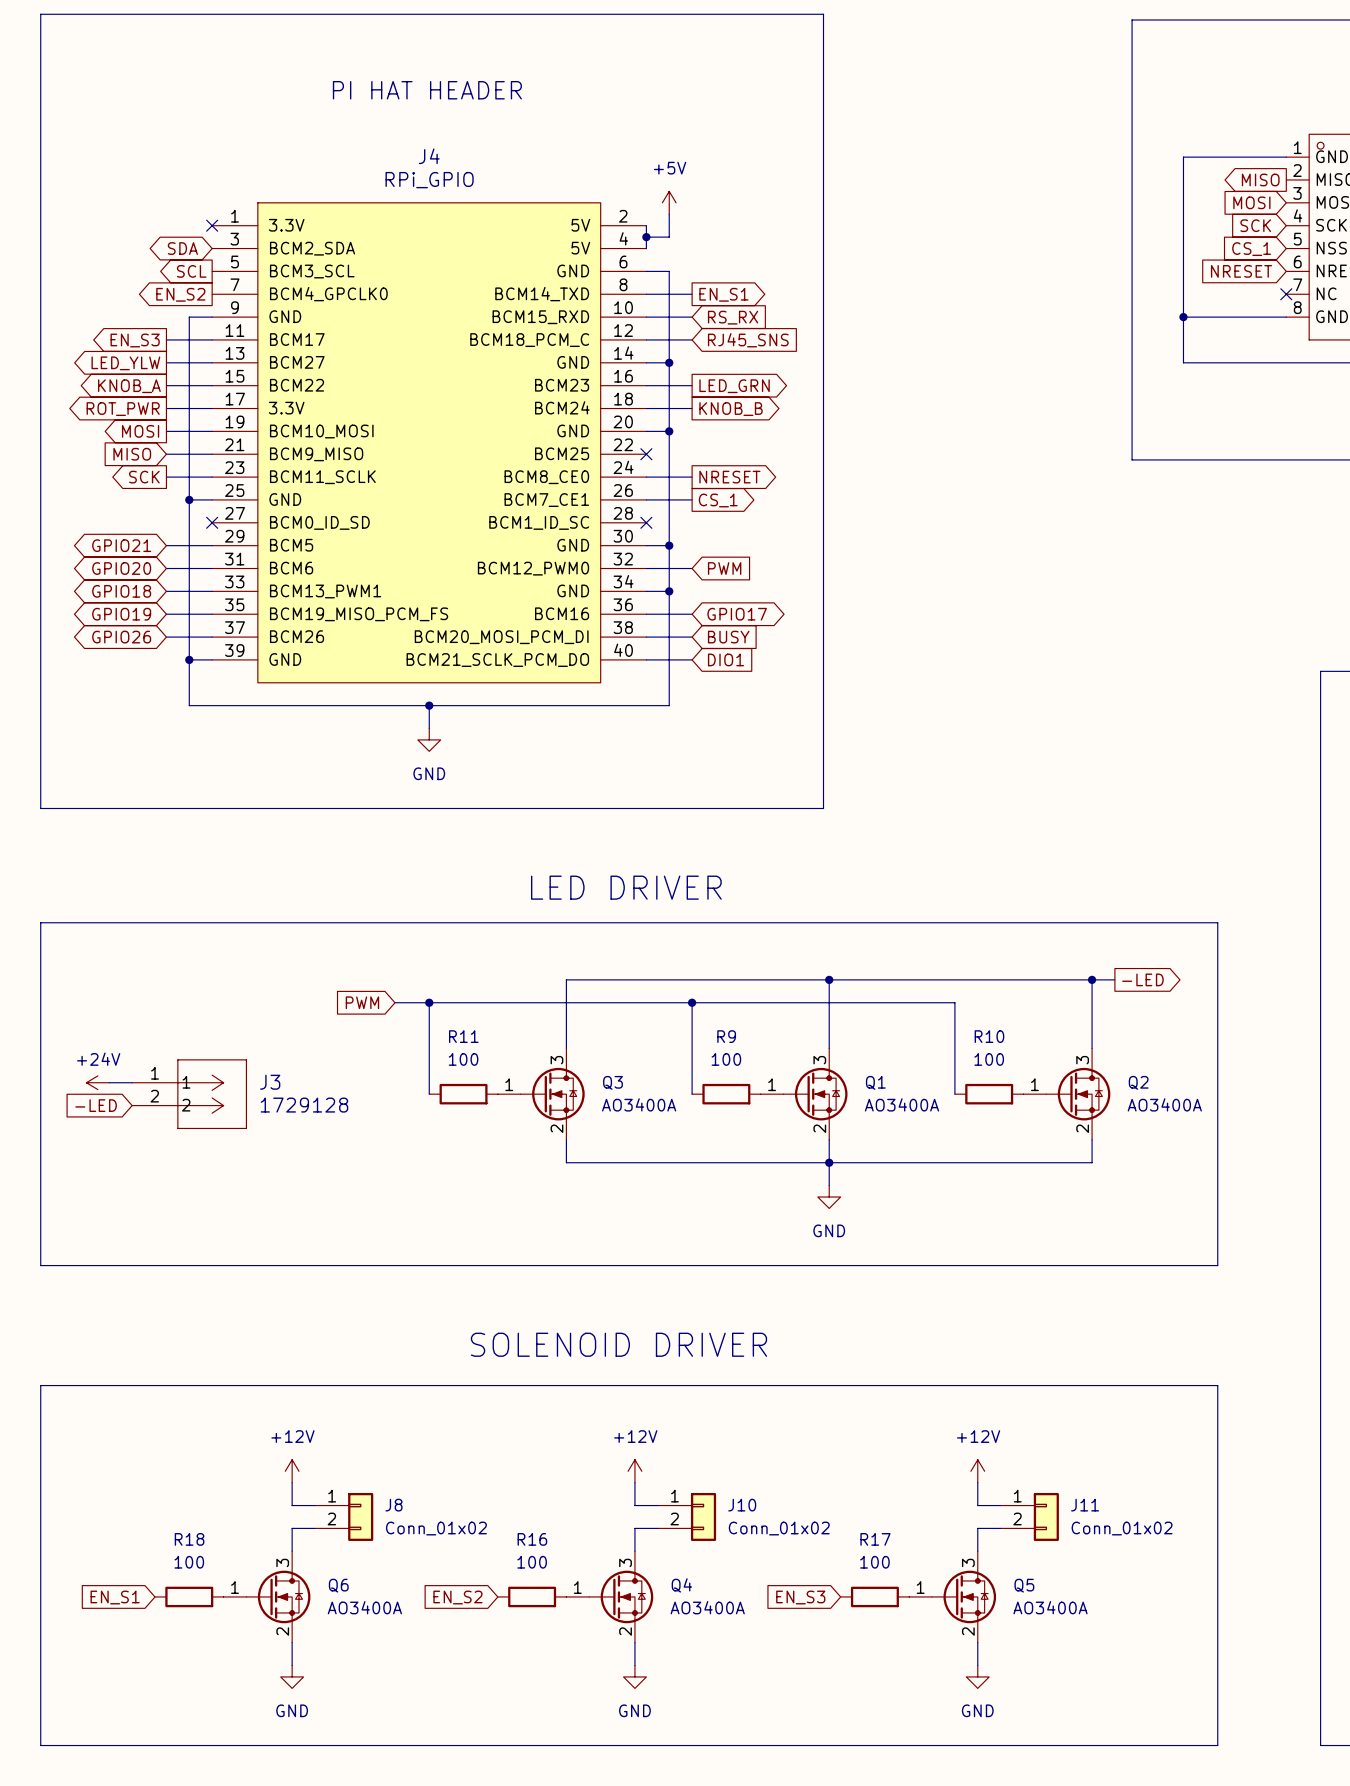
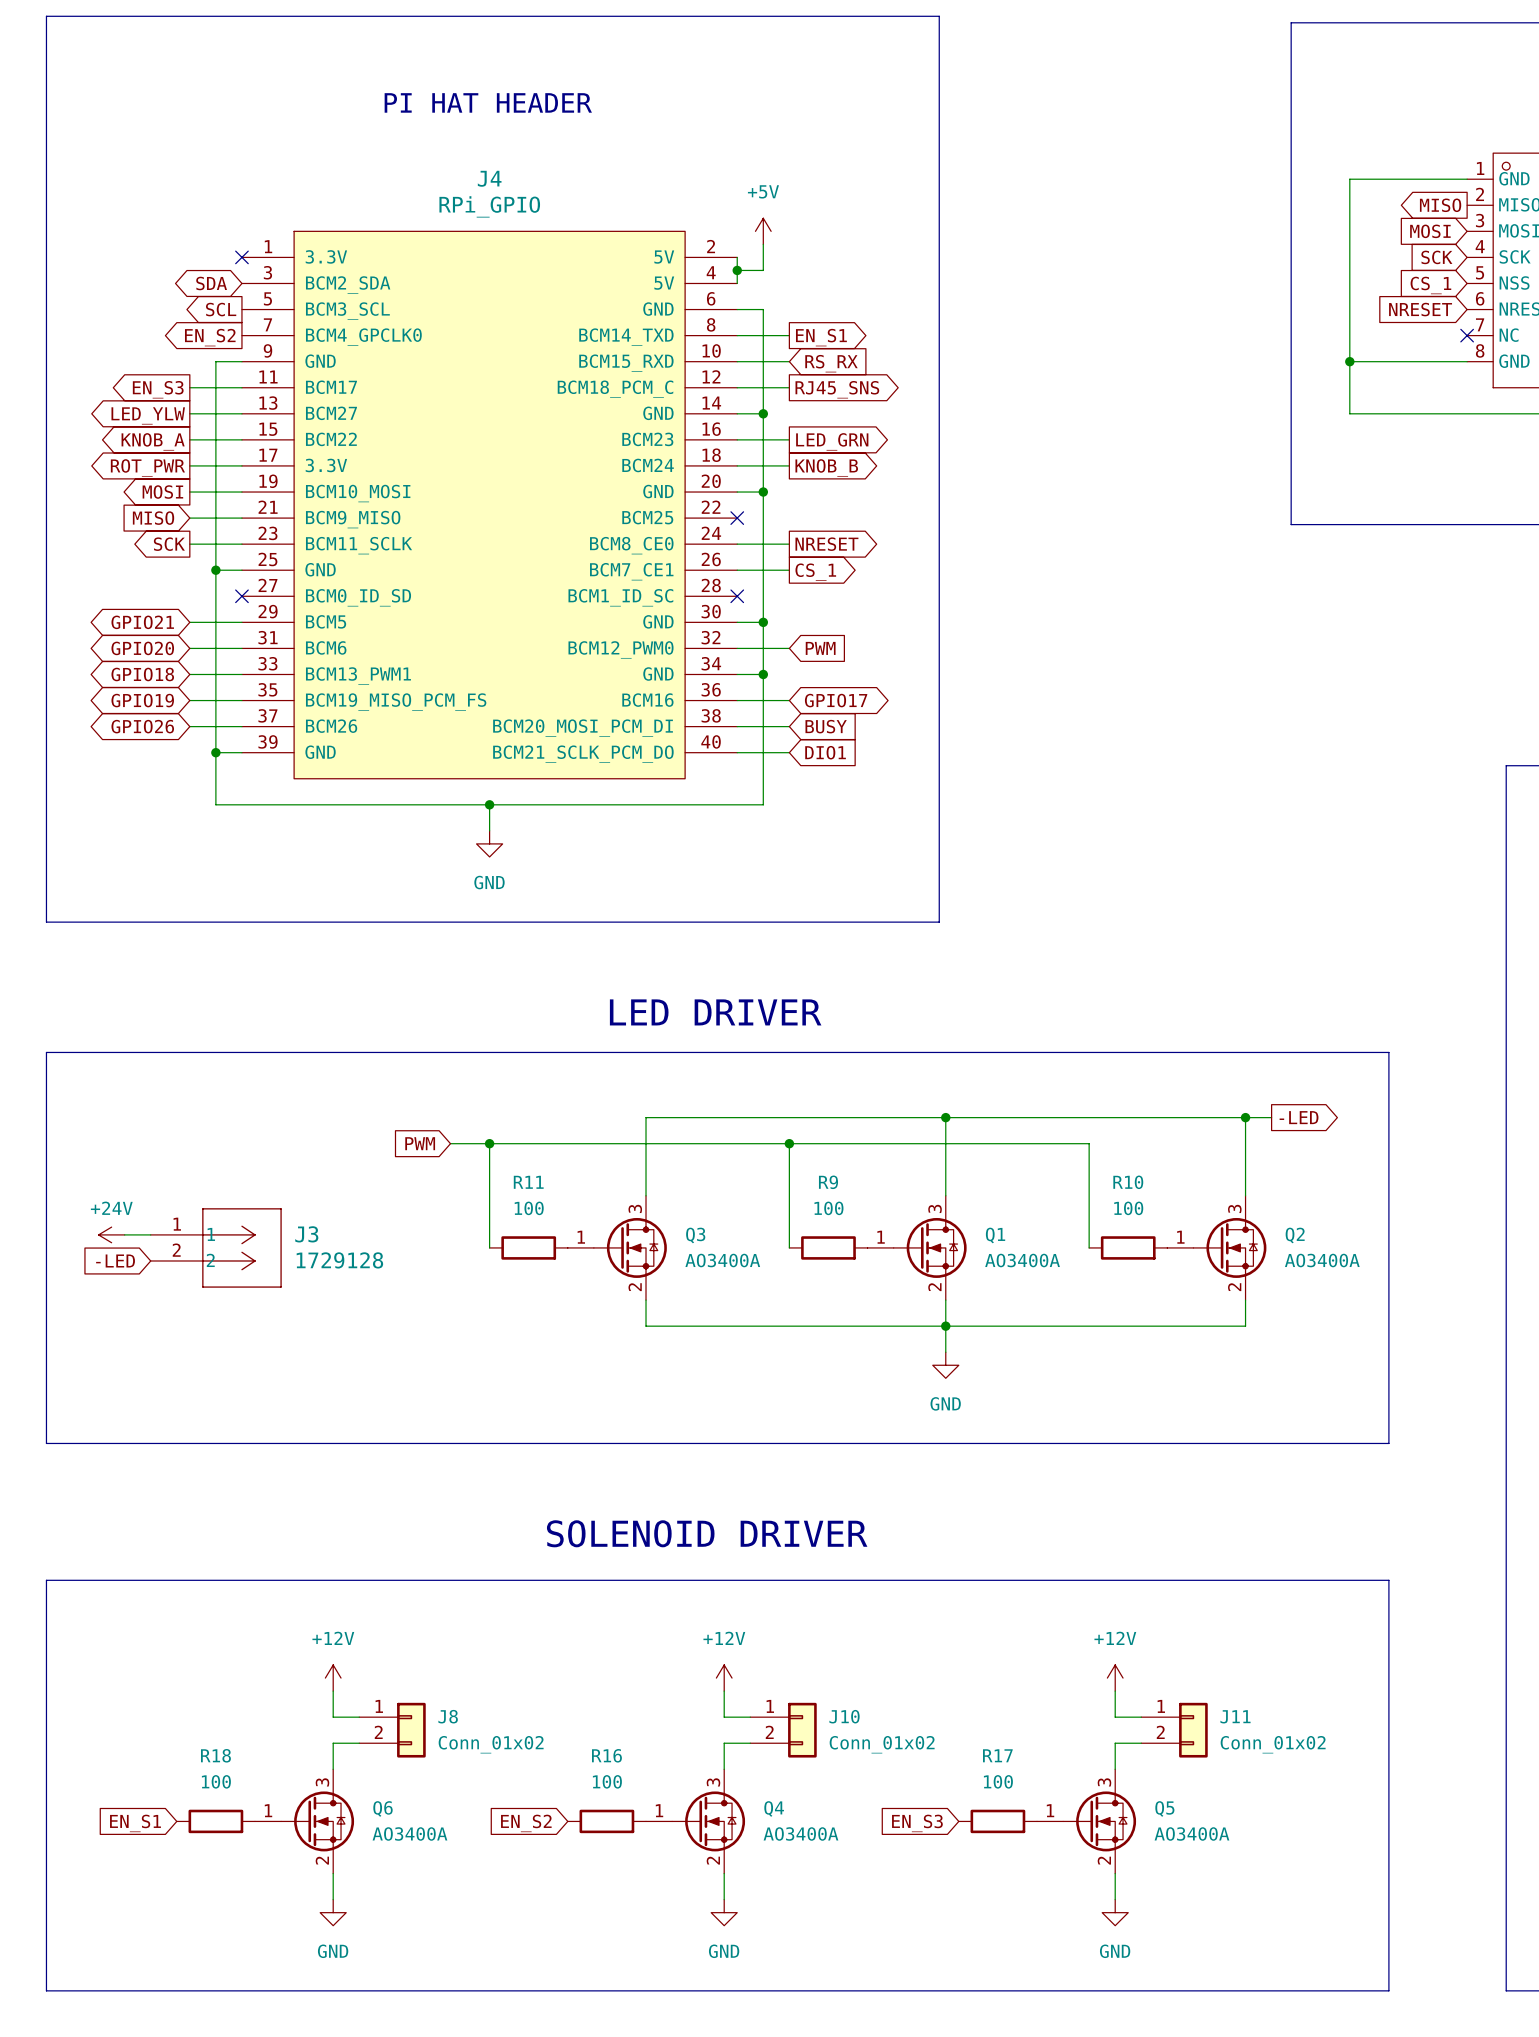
global label shape: input (748, 340) -> output (837, 389)

